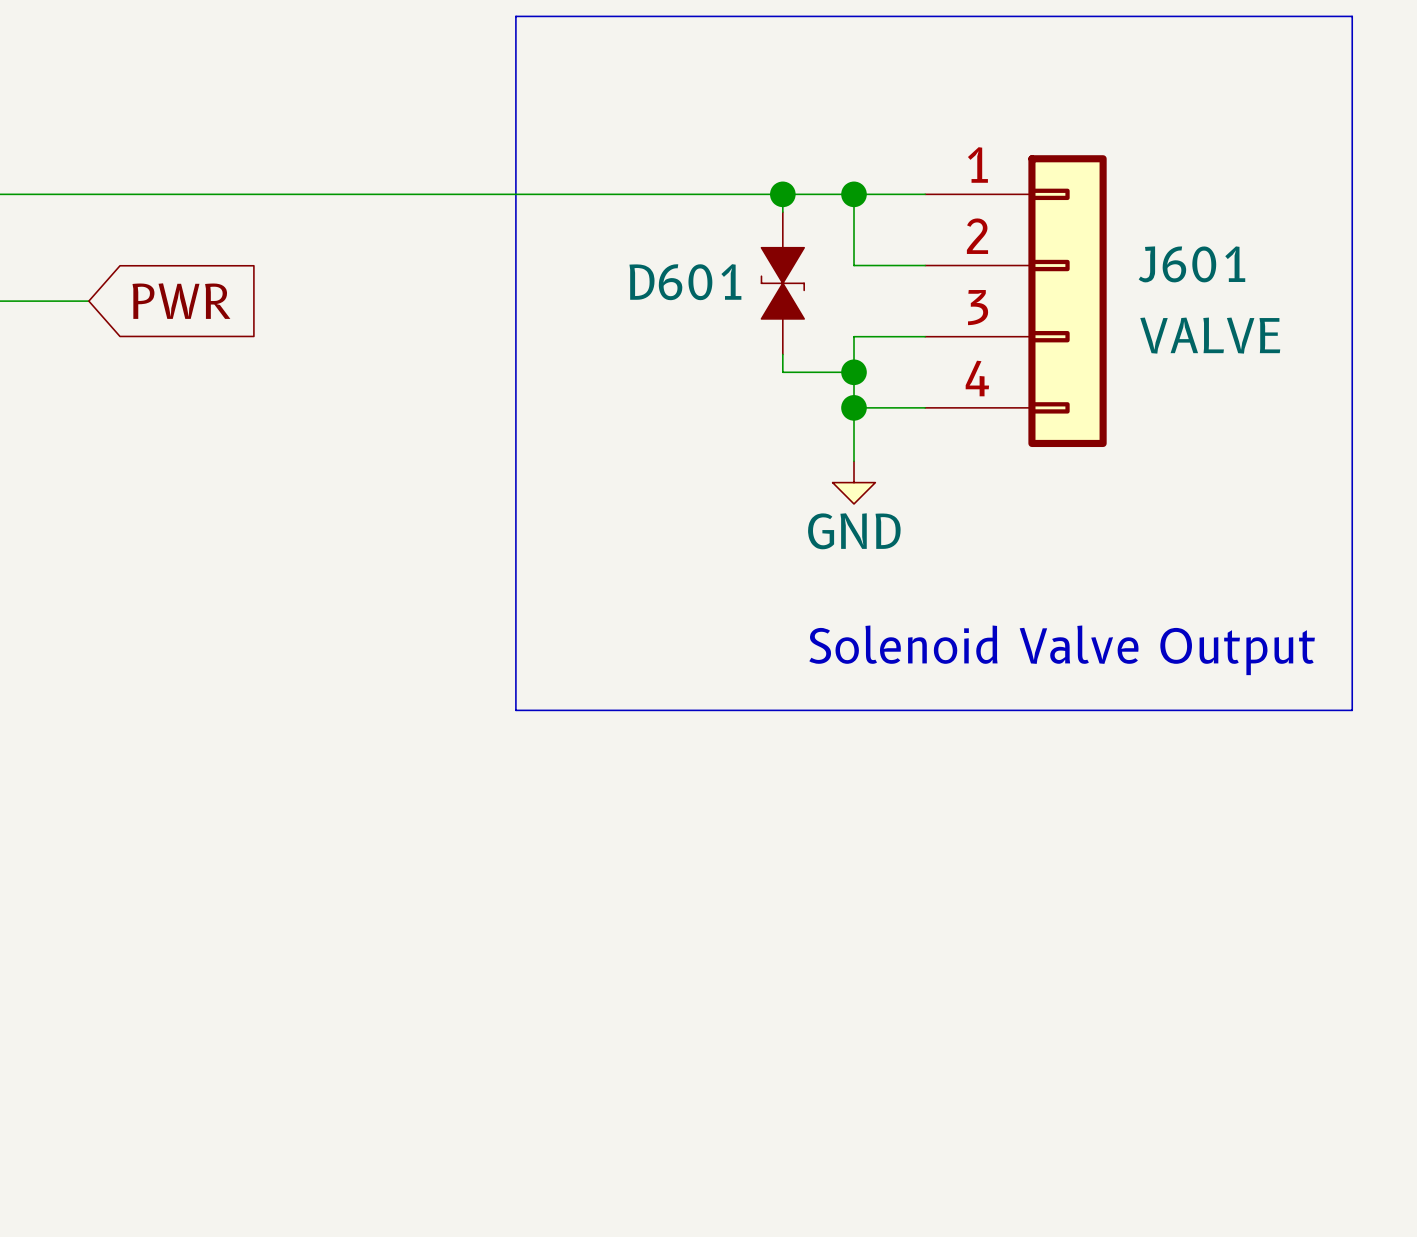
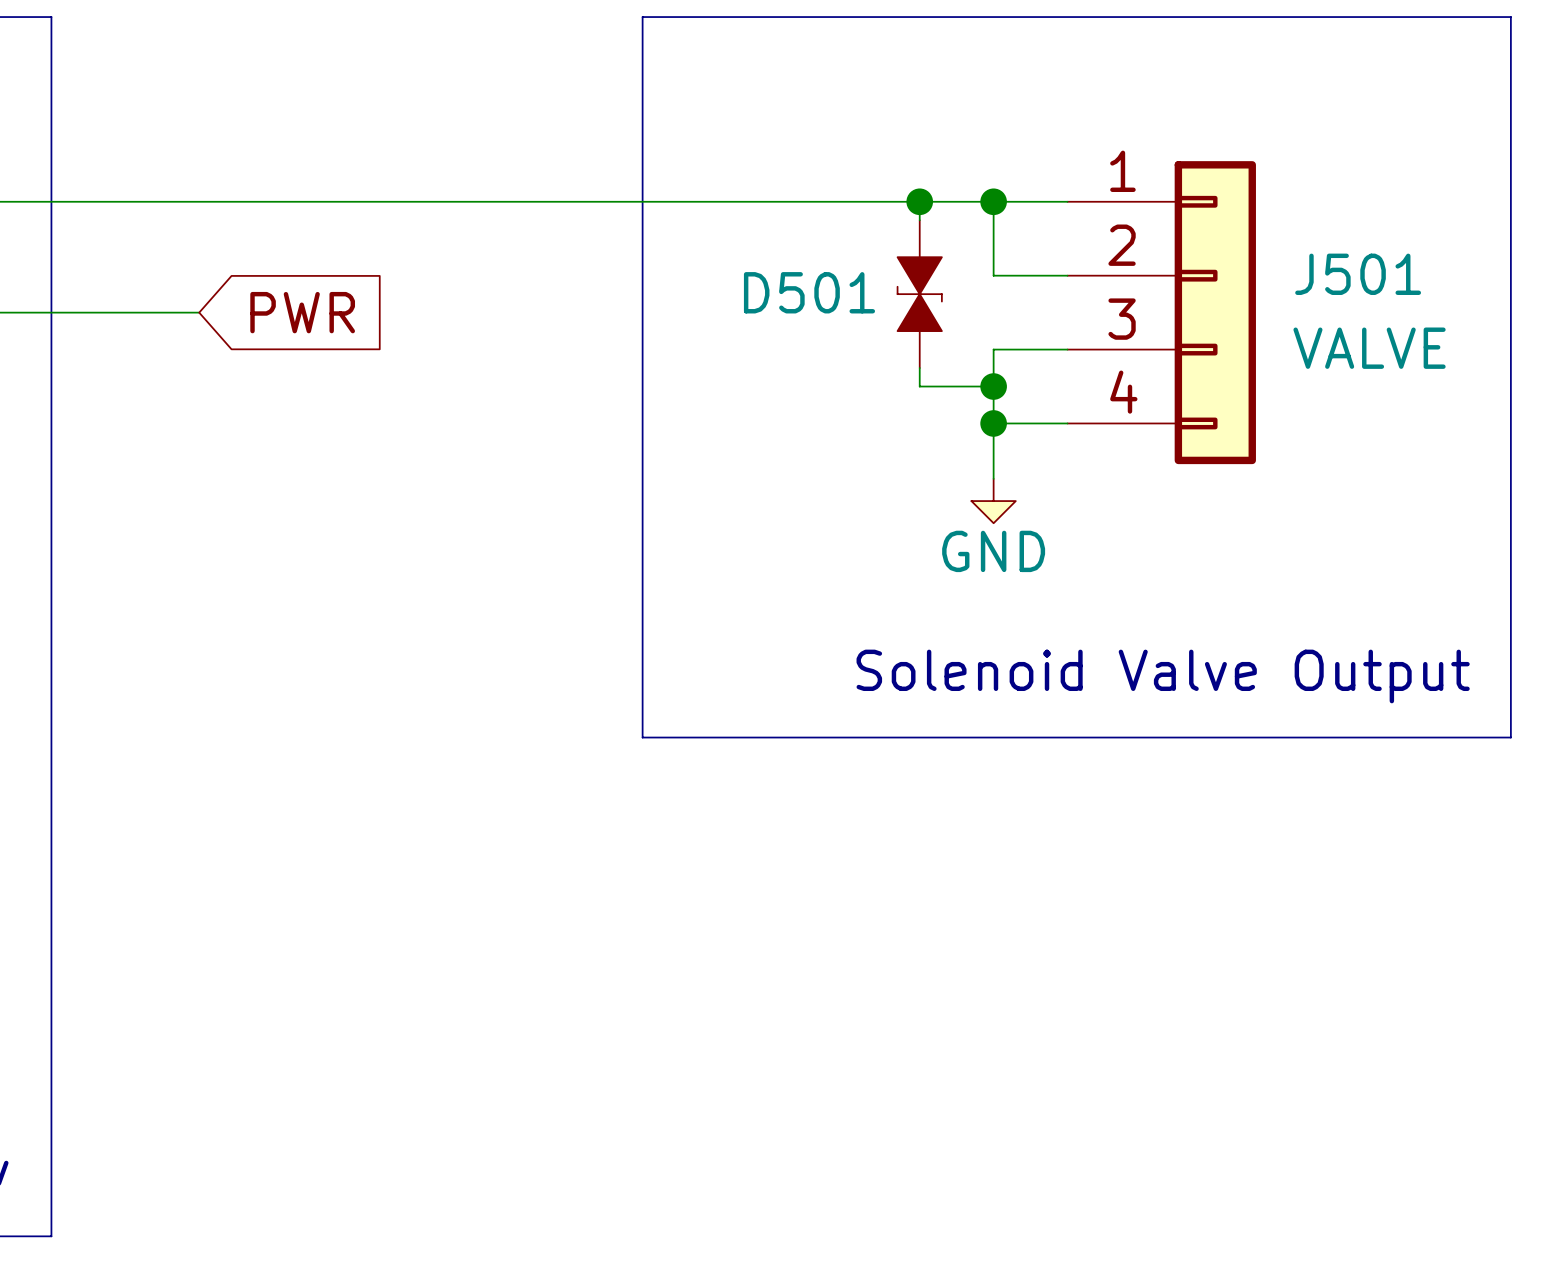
J601 name: J601 (1191, 264) -> J501 (1358, 274)
D601 name: D601 (685, 282) -> D501 (809, 292)

